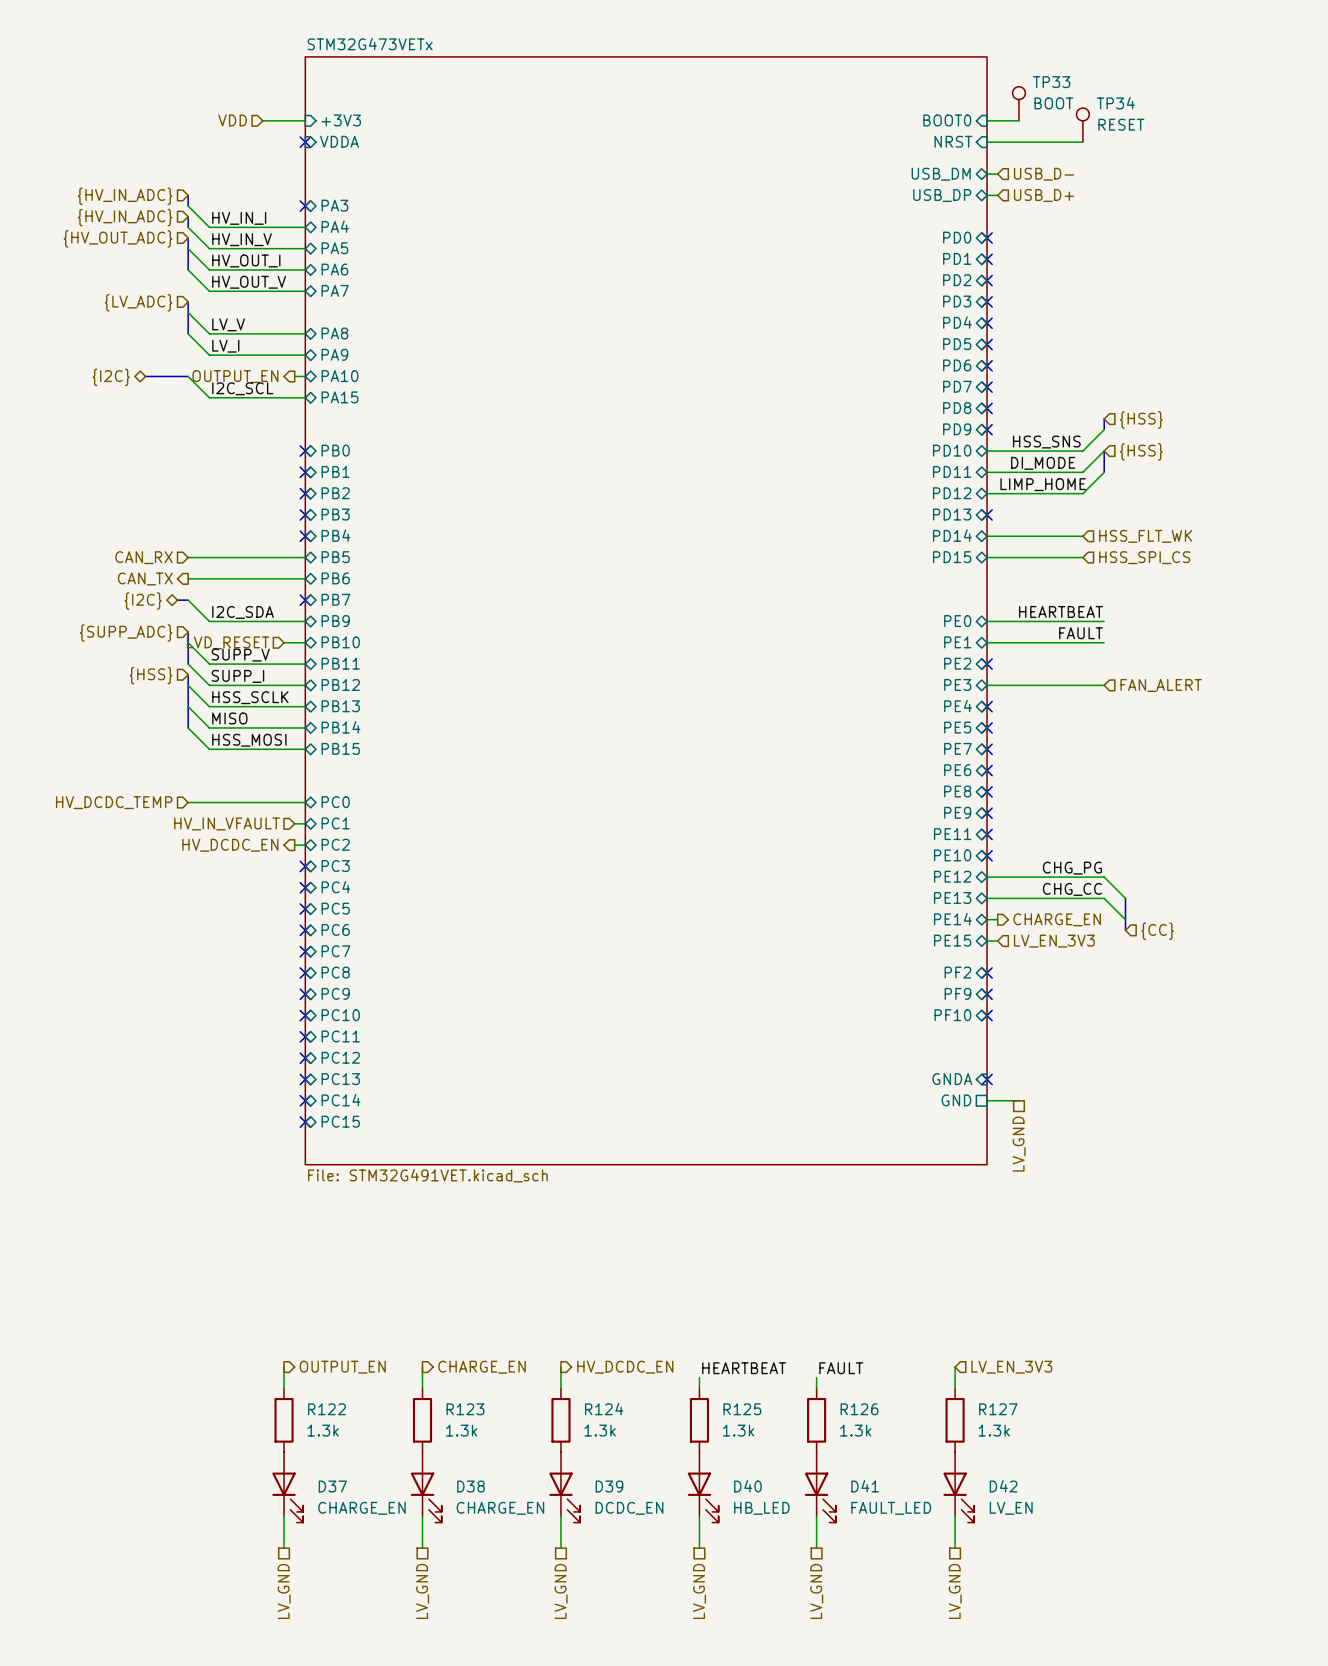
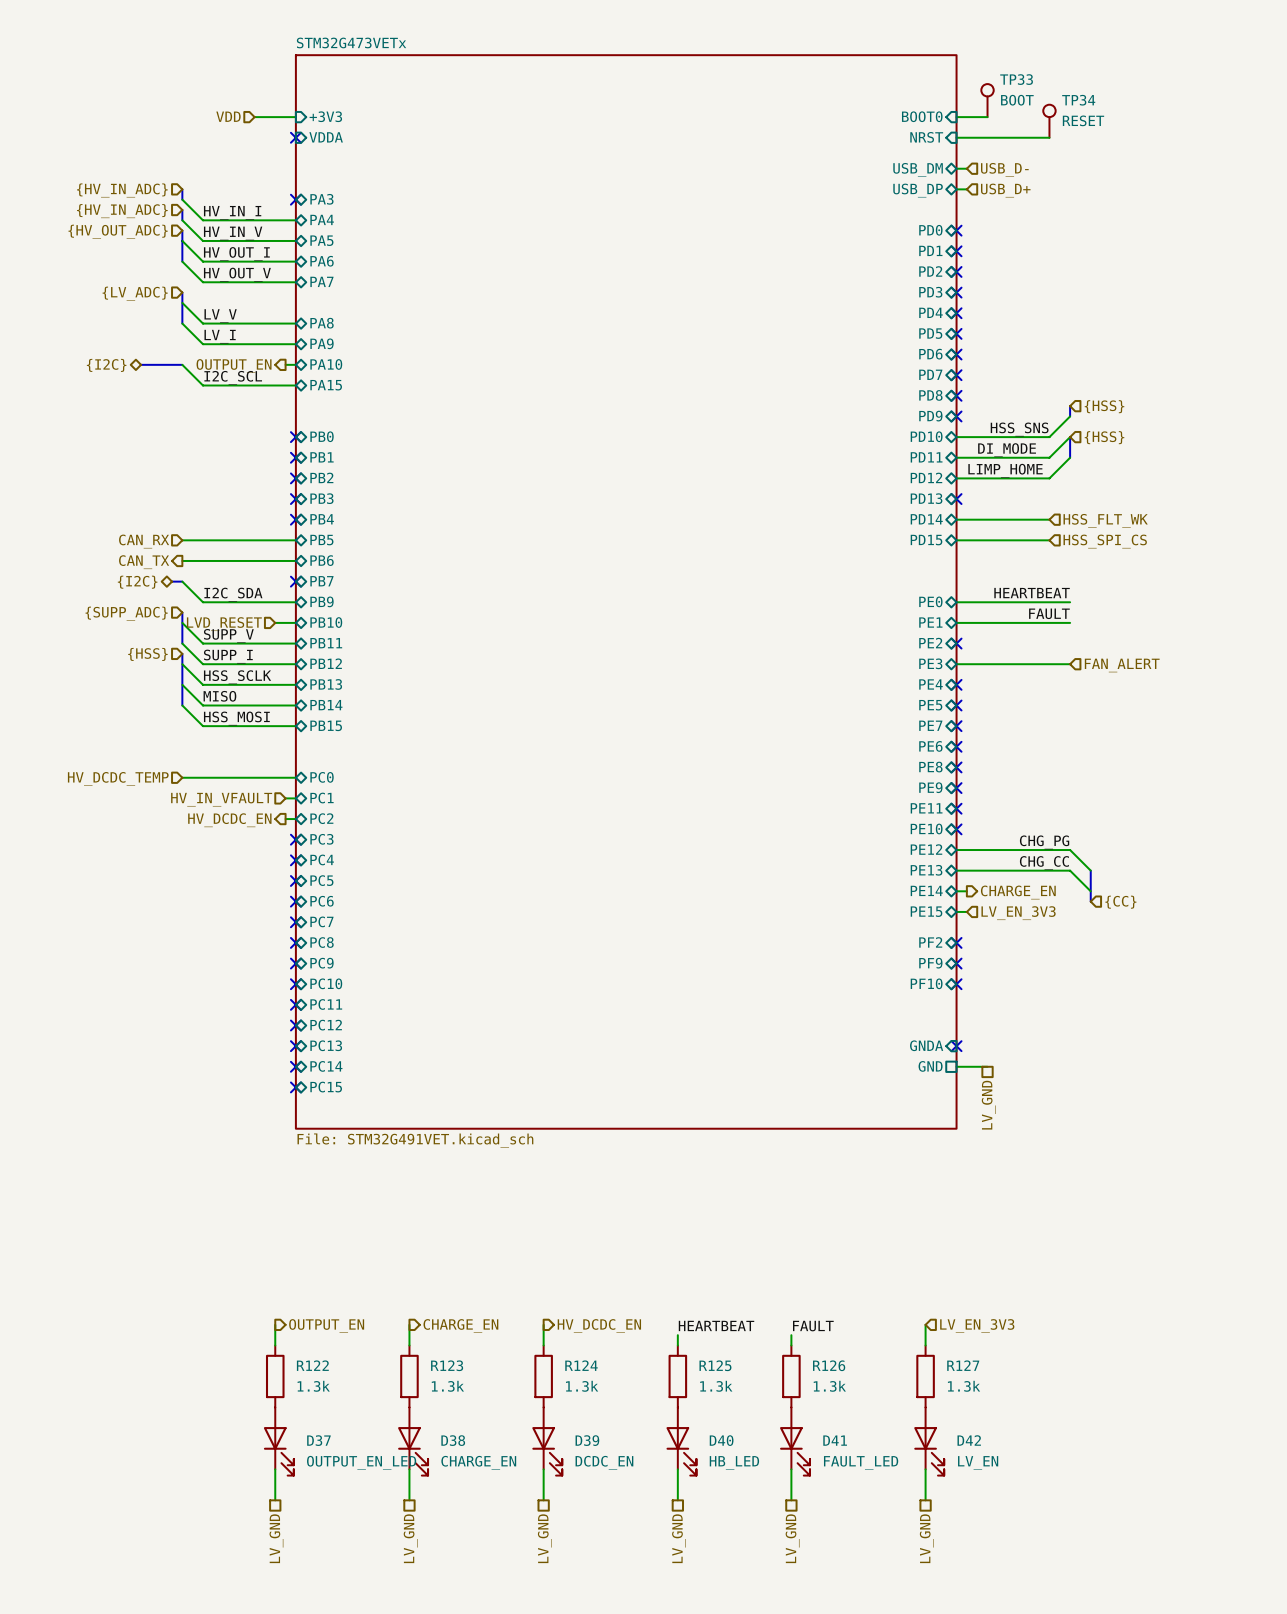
D37 value: CHARGE_EN (361, 1508) -> OUTPUT_EN_LED (361, 1462)

